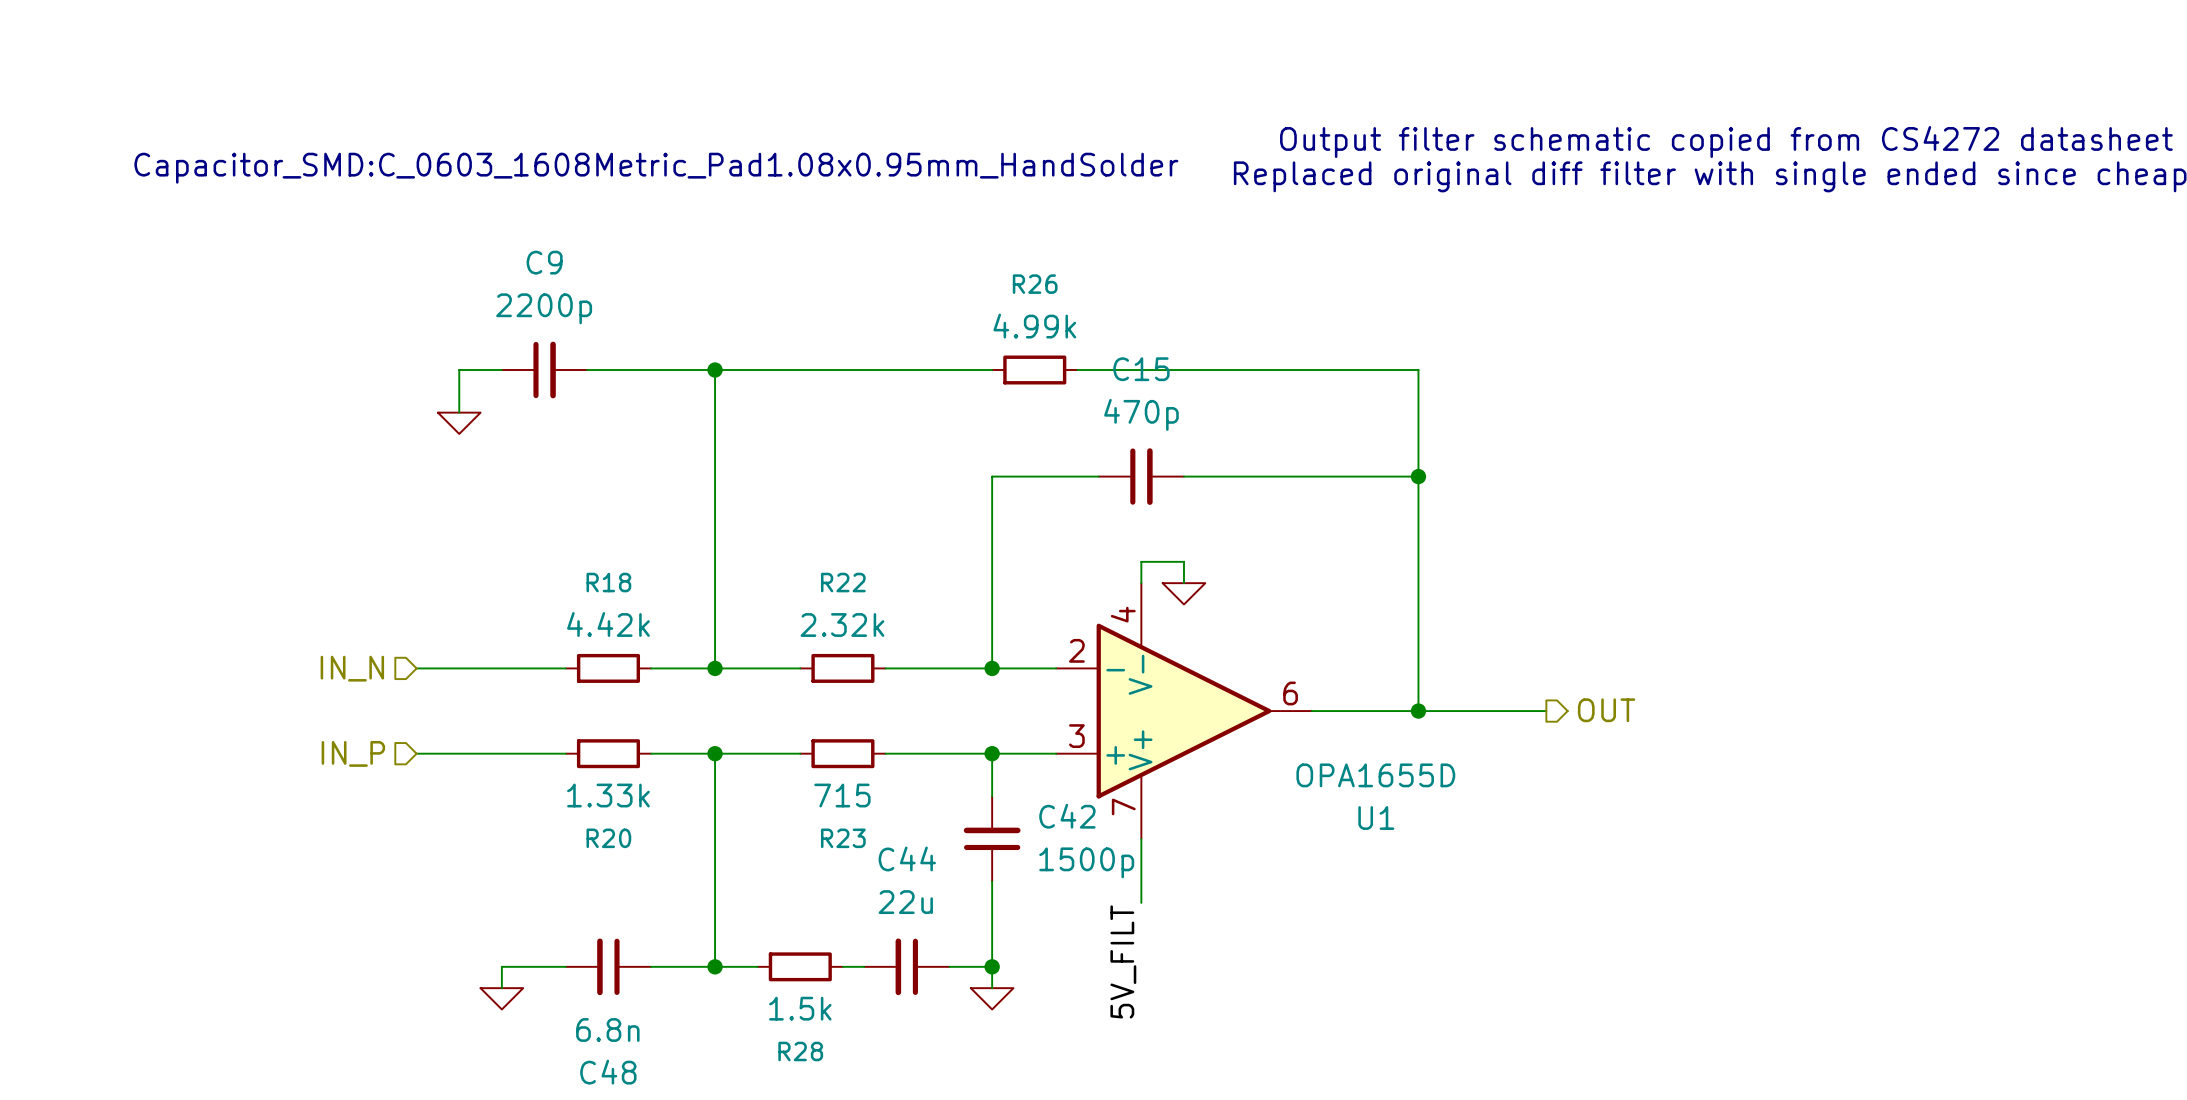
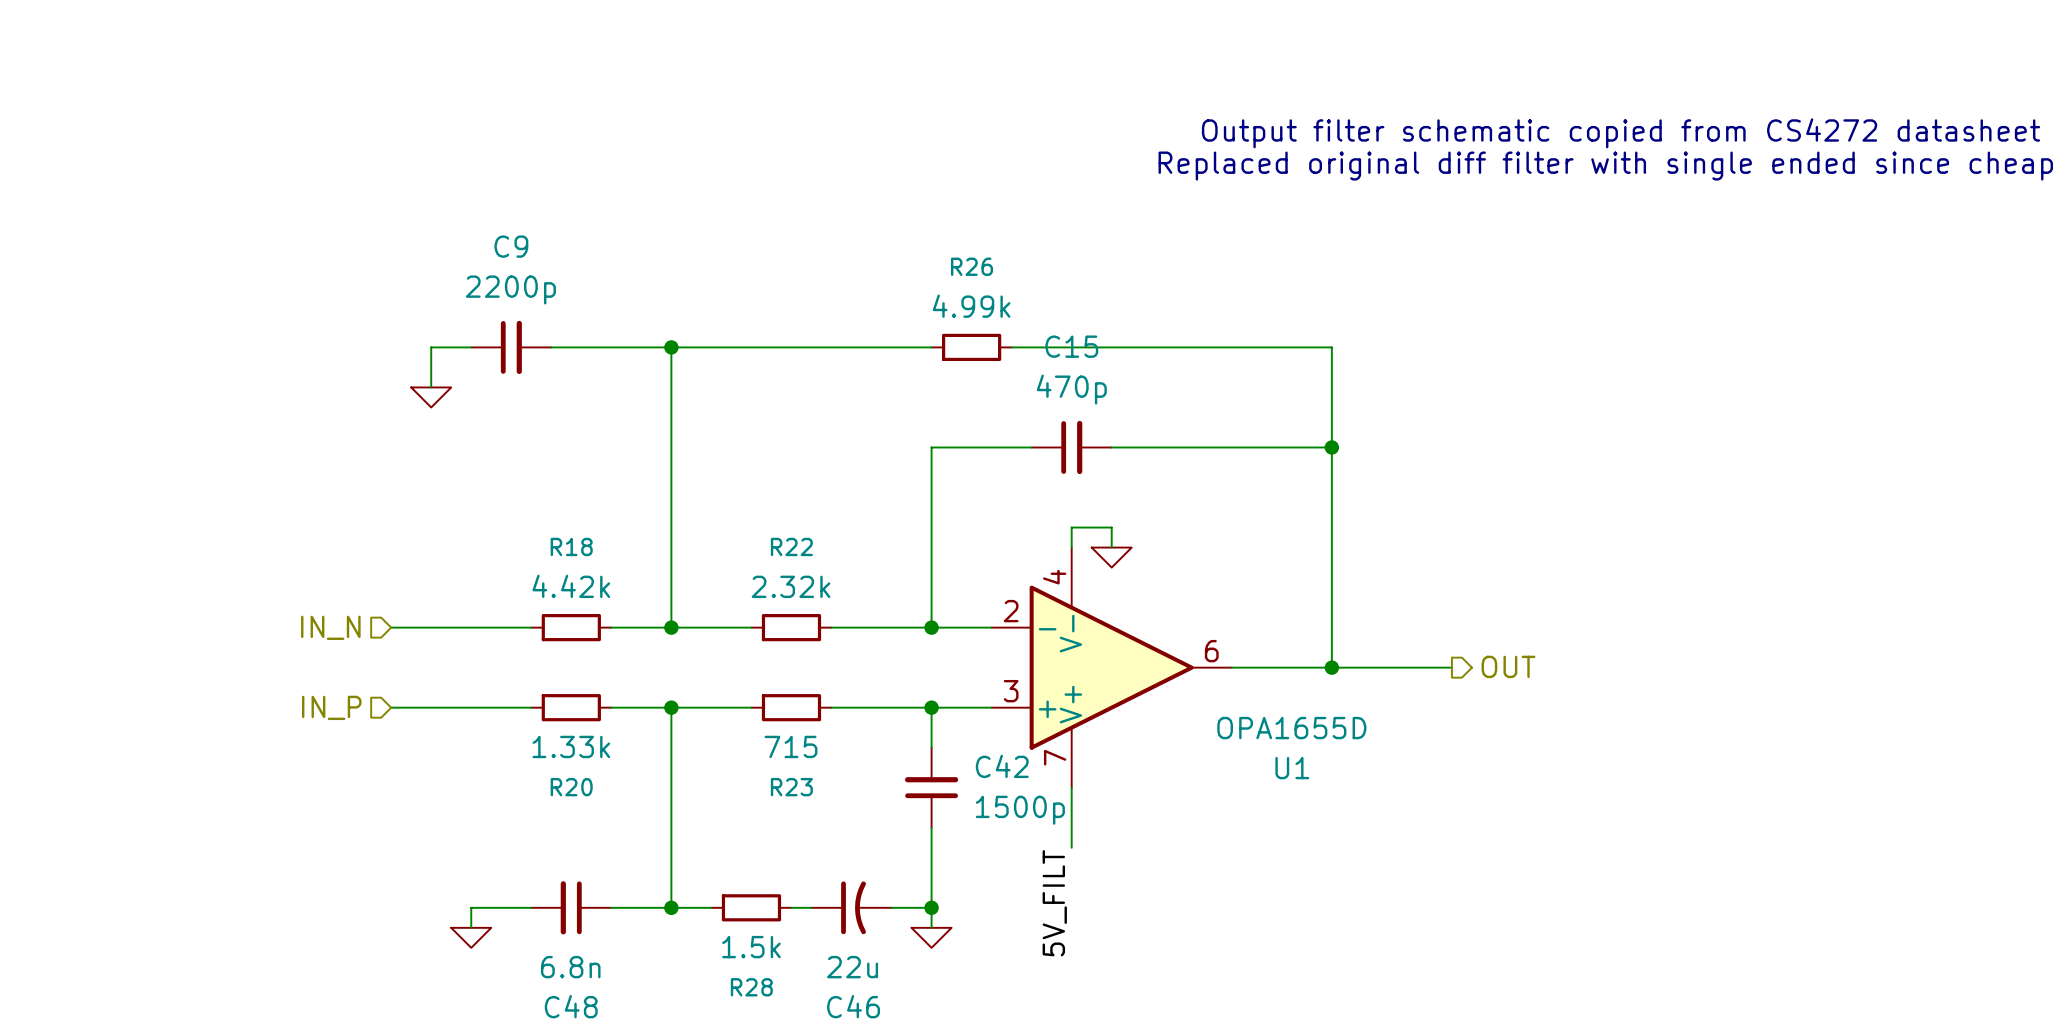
text: Capacitor_SMD:C_0603_1608Metric_Pad1.08x0.95mm_HandSolder (656, 168) -> none
C44: 22u (906, 966) -> none
C46: none -> 22u (851, 907)

